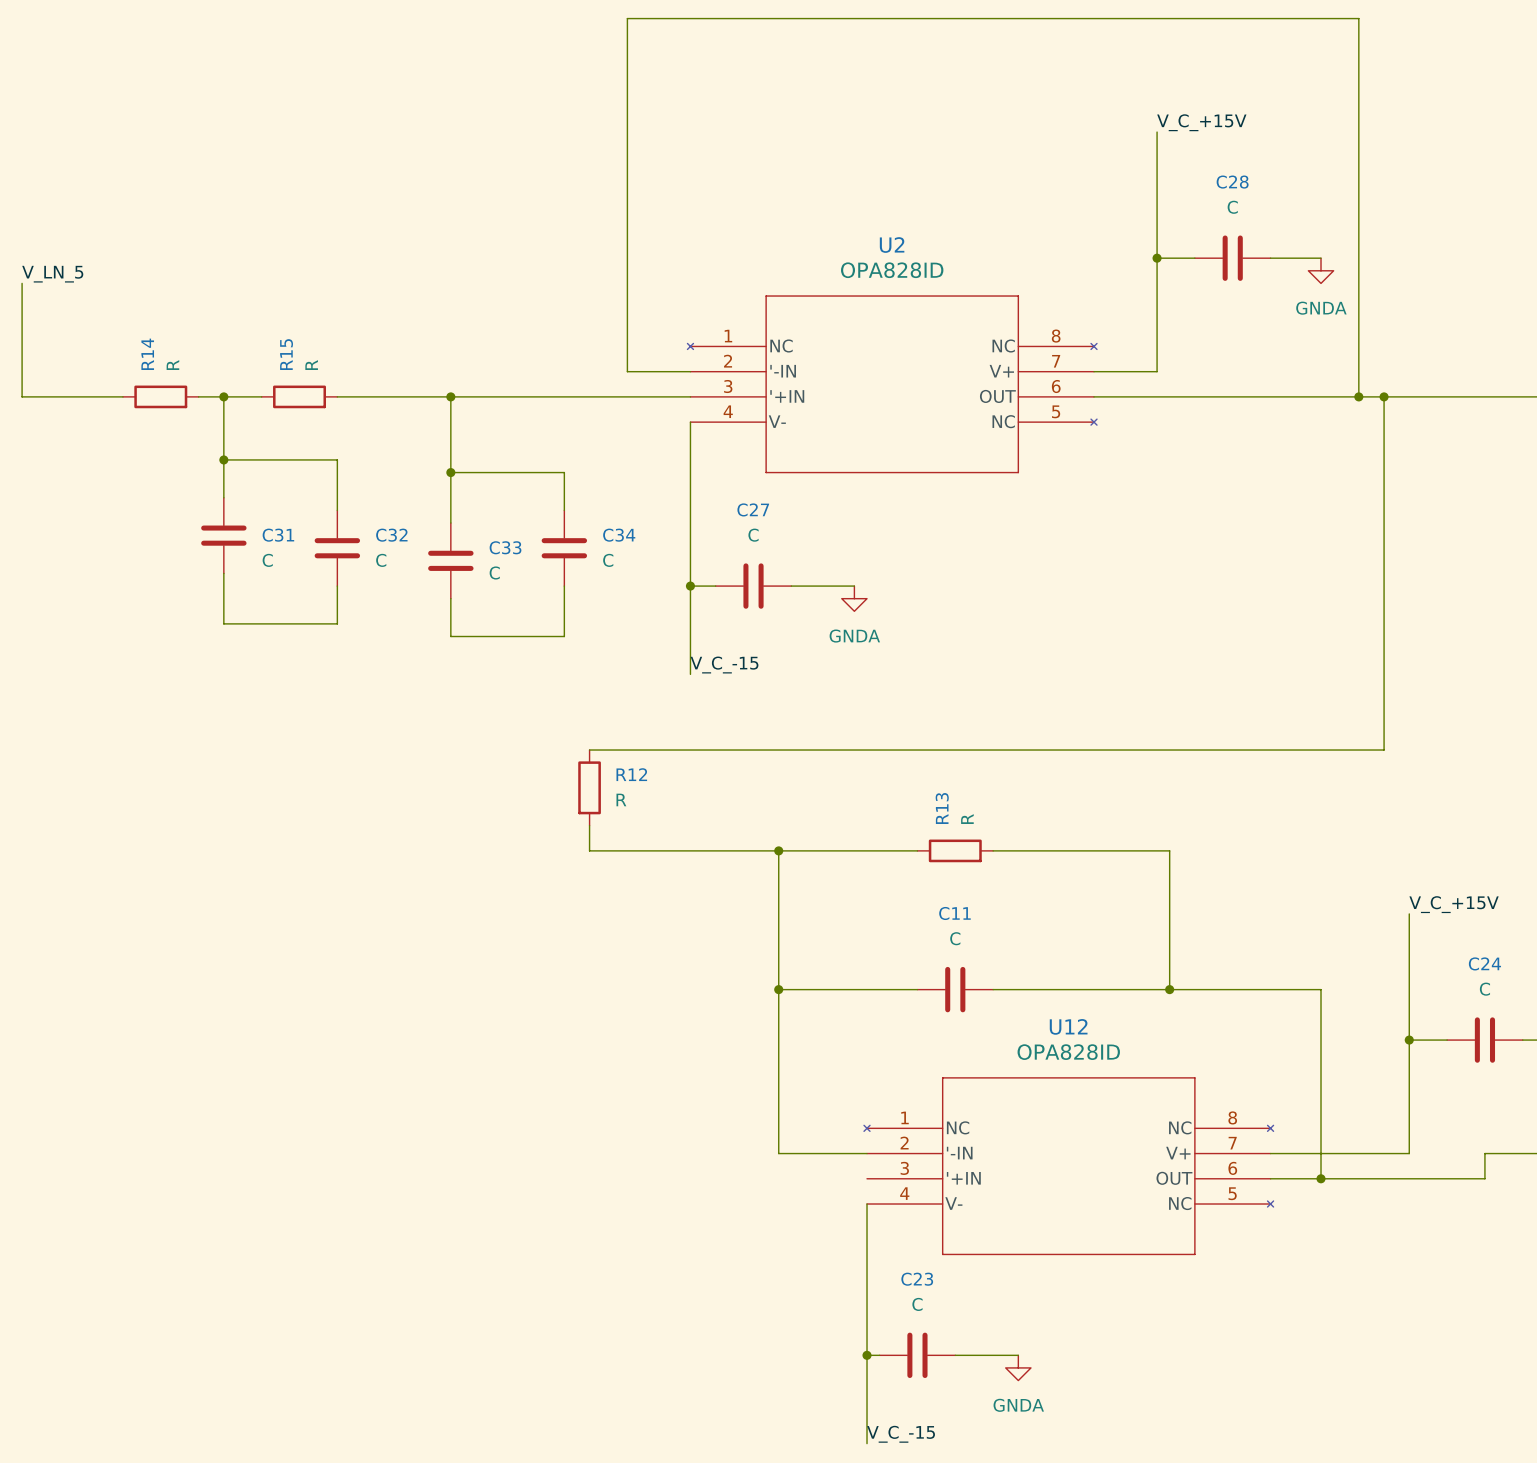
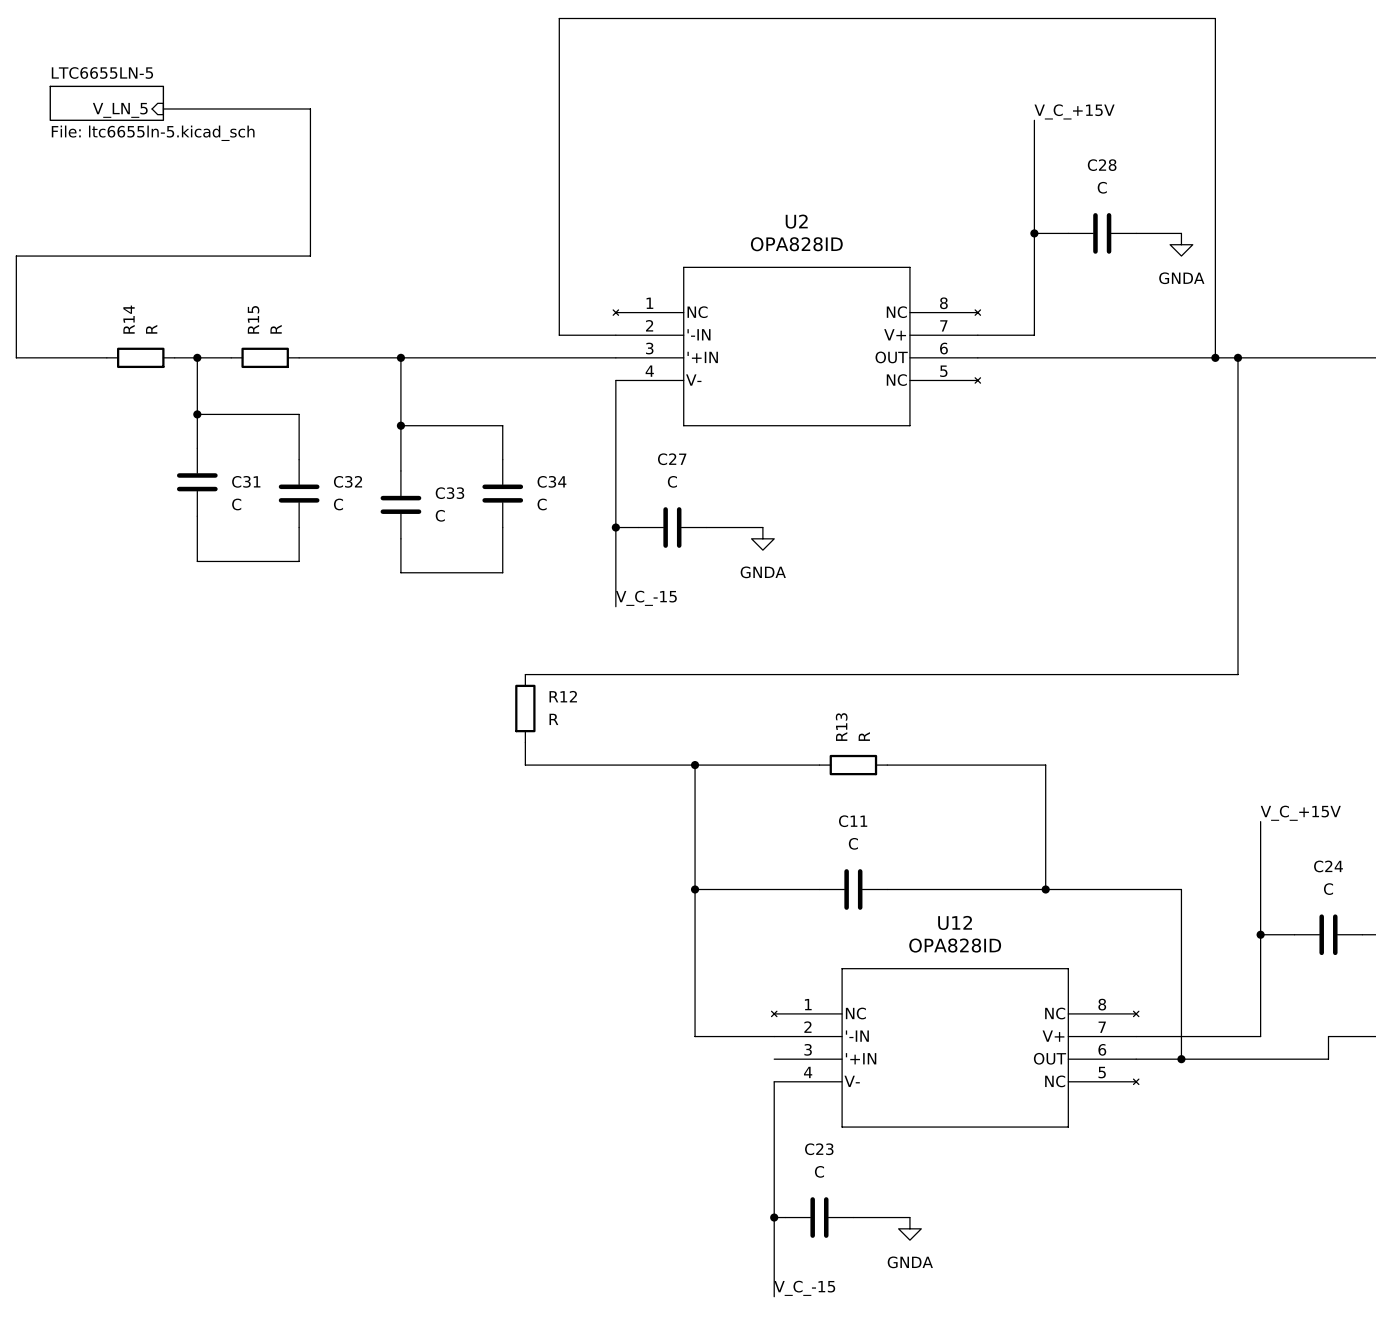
sheet LTC6655LN-5: none -> File: ltc6655ln-5.kicad_sch (106, 103)
wire: none -> (163, 108) (310, 108) (310, 256) (16, 256)
sheet pin: none -> V_LN_5 (120, 110)
label: V_LN_5 (52, 274) -> none

